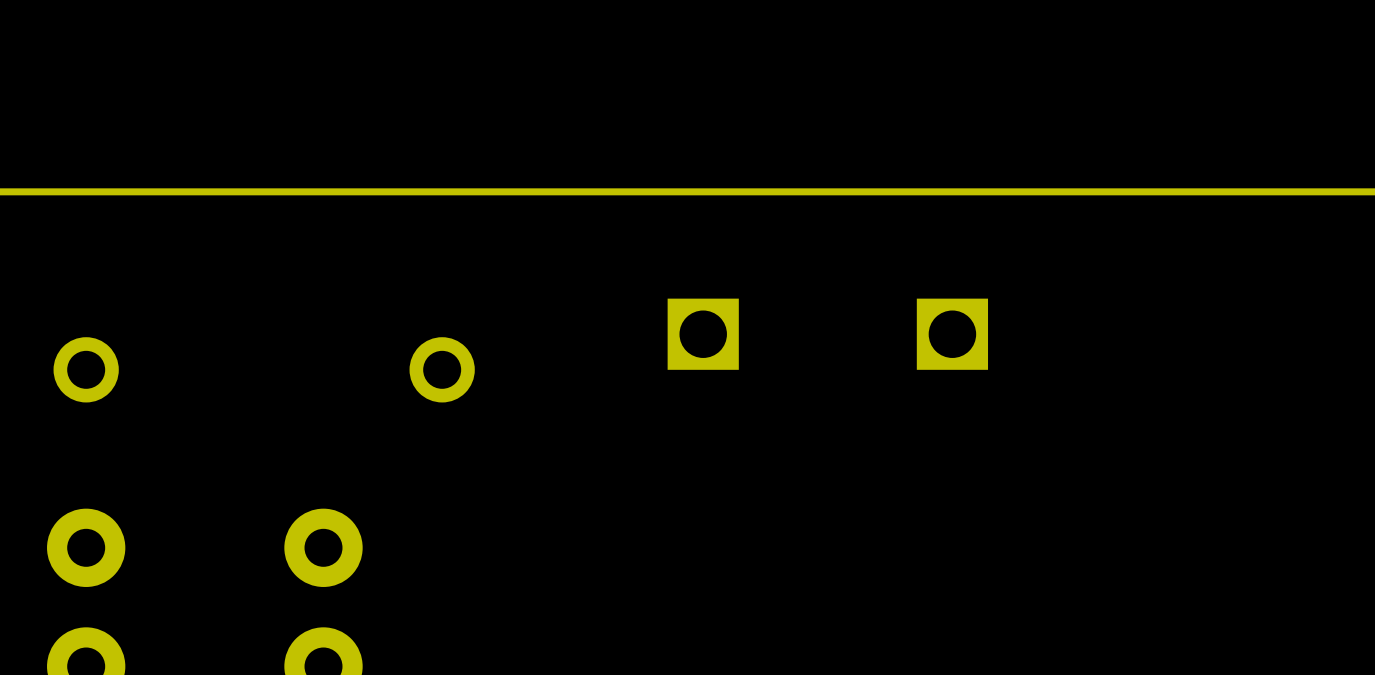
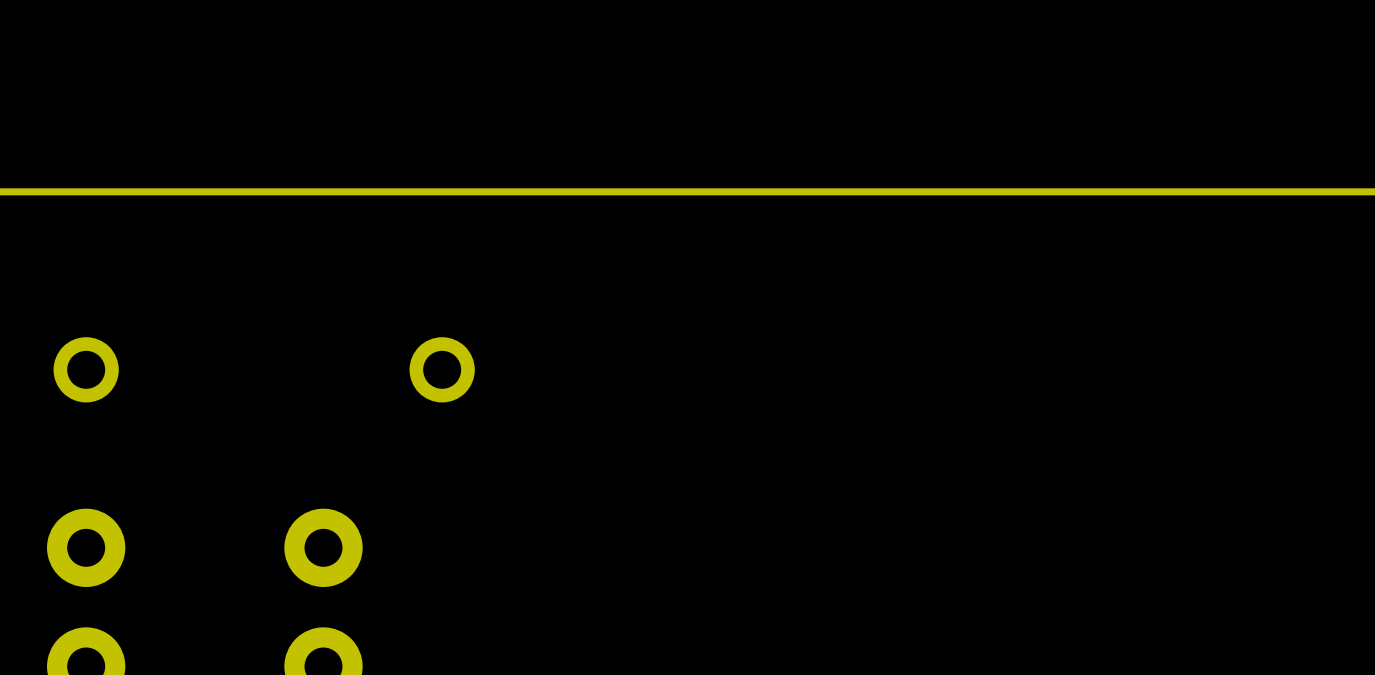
part: (703, 334) -> none
part: (952, 334) -> none

